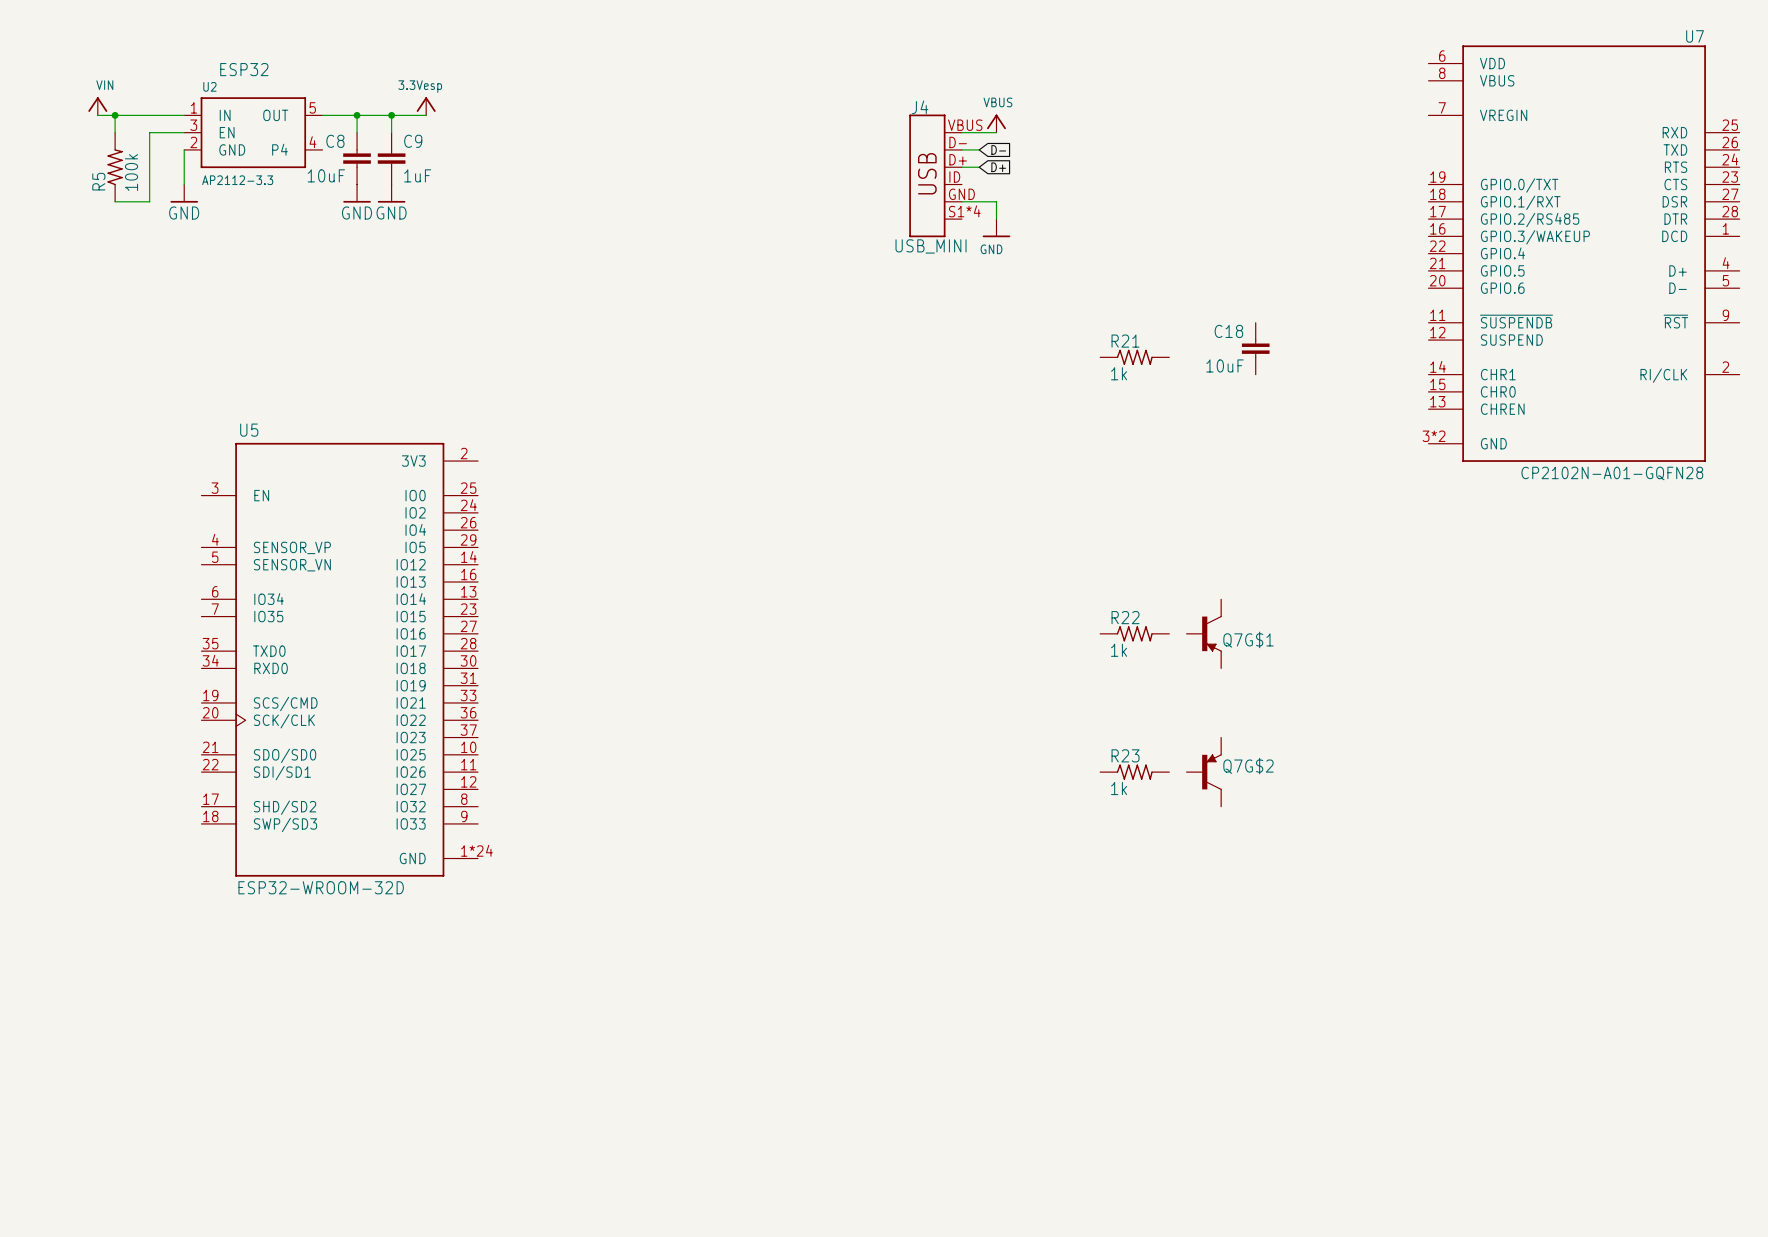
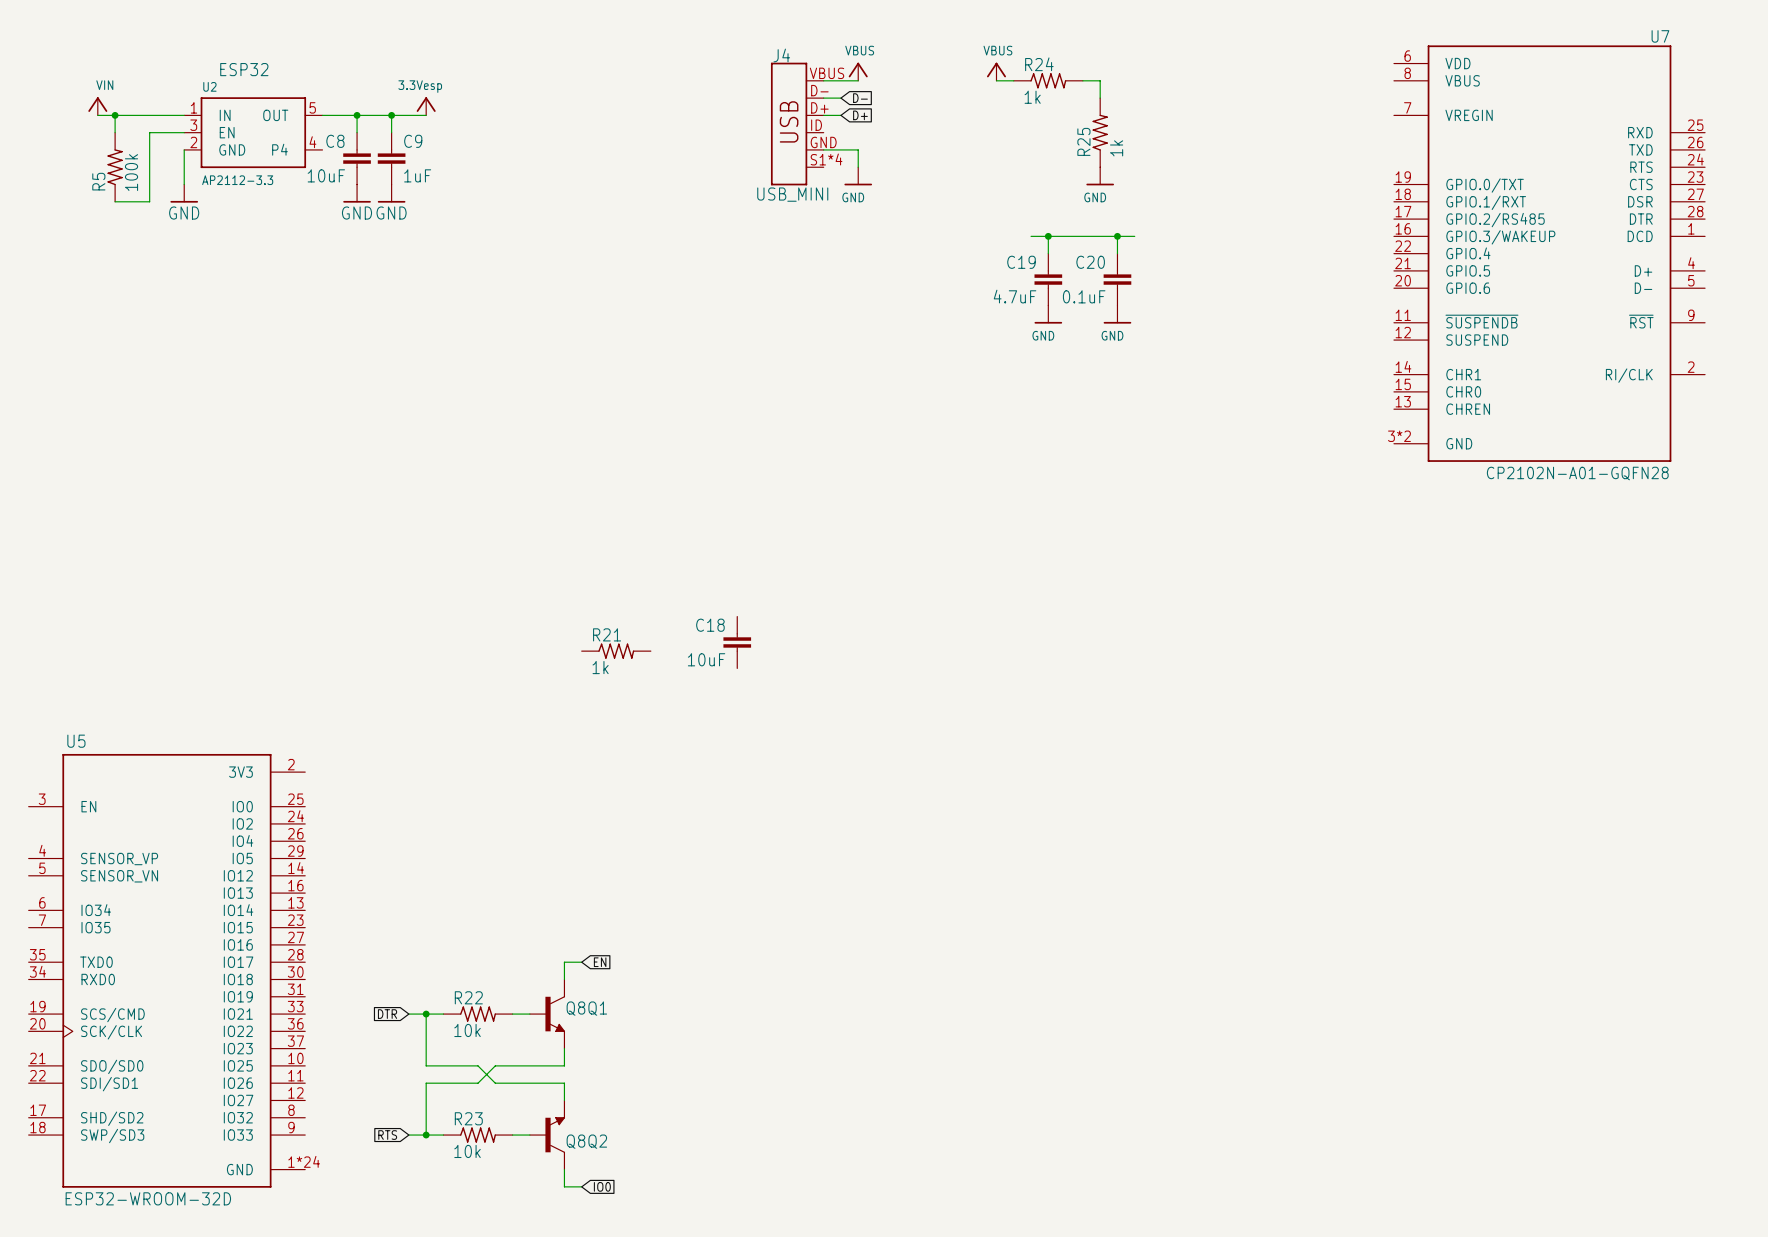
power symbol: none -> VBUS (858, 71)
wire: none -> (996, 80) (1013, 80)
R24: none -> 1k (1048, 80)
wire: none -> (1082, 80) (1100, 80) (1100, 98)
power symbol position: VBUS (996, 123) -> VBUS (996, 71)
wire: (961, 132) (996, 132) -> (823, 80) (858, 80)
R25: none -> 1k (1100, 132)
wire: (961, 149) (979, 149) -> (823, 98) (840, 98)
global label position: D- (998, 149) -> D- (860, 98)
wire: (961, 167) (979, 167) -> (823, 115) (840, 115)
global label position: D+ (998, 167) -> D+ (860, 115)
J4 position: (935, 175) -> (797, 124)
power symbol: none -> GND (858, 176)
power symbol: none -> GND (1100, 176)
wire: (961, 201) (996, 201) (996, 219) -> (823, 149) (858, 149) (858, 167)
power symbol: GND (996, 228) -> none
wire: none -> (1031, 236) (1134, 236)
wire: none -> (1048, 236) (1048, 253)
junction: none -> (1048, 236)
wire: none -> (1117, 236) (1117, 253)
junction: none -> (1117, 236)
U7 position: (1584, 253) -> (1549, 253)
C19: none -> 4.7uF (1048, 279)
C20: none -> 0.1uF (1117, 279)
power symbol: none -> GND (1048, 314)
power symbol: none -> GND (1117, 314)
C18 position: (1255, 348) -> (737, 642)
R21 position: (1134, 357) -> (616, 651)
R22 position: (1134, 633) -> (478, 1014)
Q7G$1: (1204, 633) -> none
R22 value: 1k (1119, 650) -> 10k (467, 1030)
U5 position: (339, 659) -> (166, 970)
R23 position: (1134, 772) -> (478, 1135)
Q7G$2: (1204, 772) -> none
R23 value: 1k (1119, 788) -> 10k (467, 1151)
wire: none -> (581, 962) (564, 962) (564, 979)
global label: none -> EN (600, 962)
global label: none -> DTR (387, 1014)
wire: none -> (408, 1014) (443, 1014)
wire: none -> (426, 1014) (426, 1065) (478, 1065) (495, 1083) (564, 1083) (564, 1100)
junction: none -> (426, 1014)
wire: none -> (512, 1014) (529, 1014)
Q8Q1: none -> (547, 1014)
wire: none -> (564, 1048) (564, 1065) (495, 1065) (478, 1083) (426, 1083) (426, 1135)
global label: none -> RTS (387, 1135)
wire: none -> (408, 1135) (443, 1135)
junction: none -> (426, 1135)
wire: none -> (512, 1135) (529, 1135)
Q8Q2: none -> (547, 1135)
wire: none -> (564, 1169) (564, 1186) (581, 1186)
global label: none -> IO0 (602, 1186)

